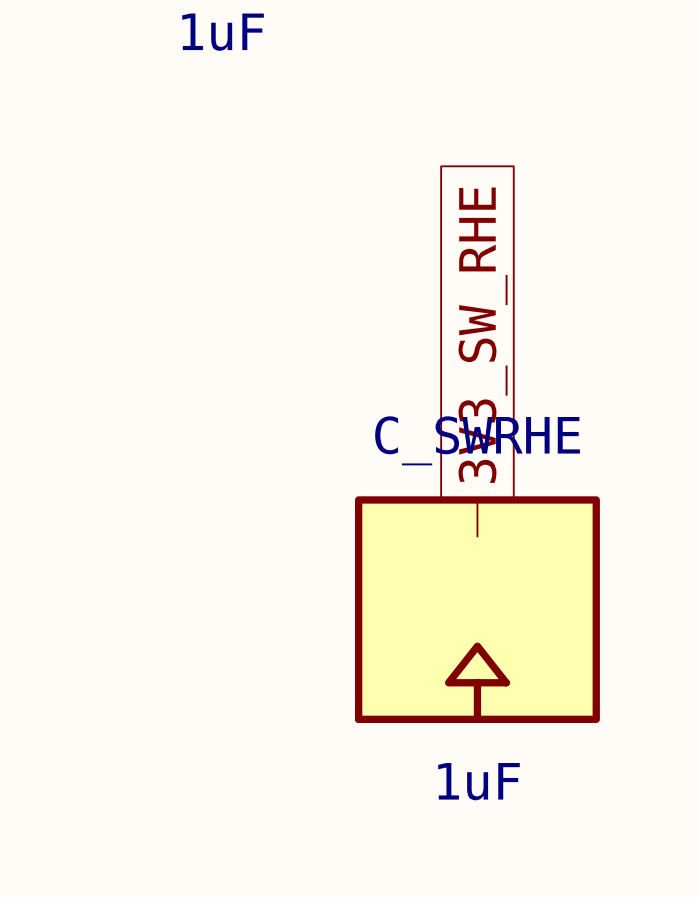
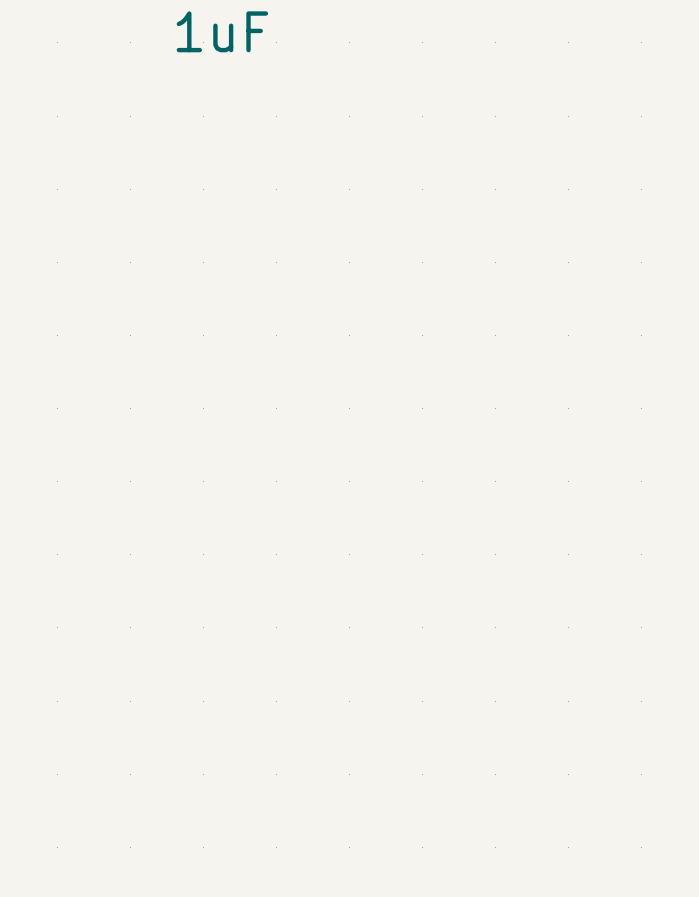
global label: 3V3_SW_RHE (483, 335) -> none
C_SWRHE: 1uF (477, 609) -> none
power symbol: (477, 682) -> none

